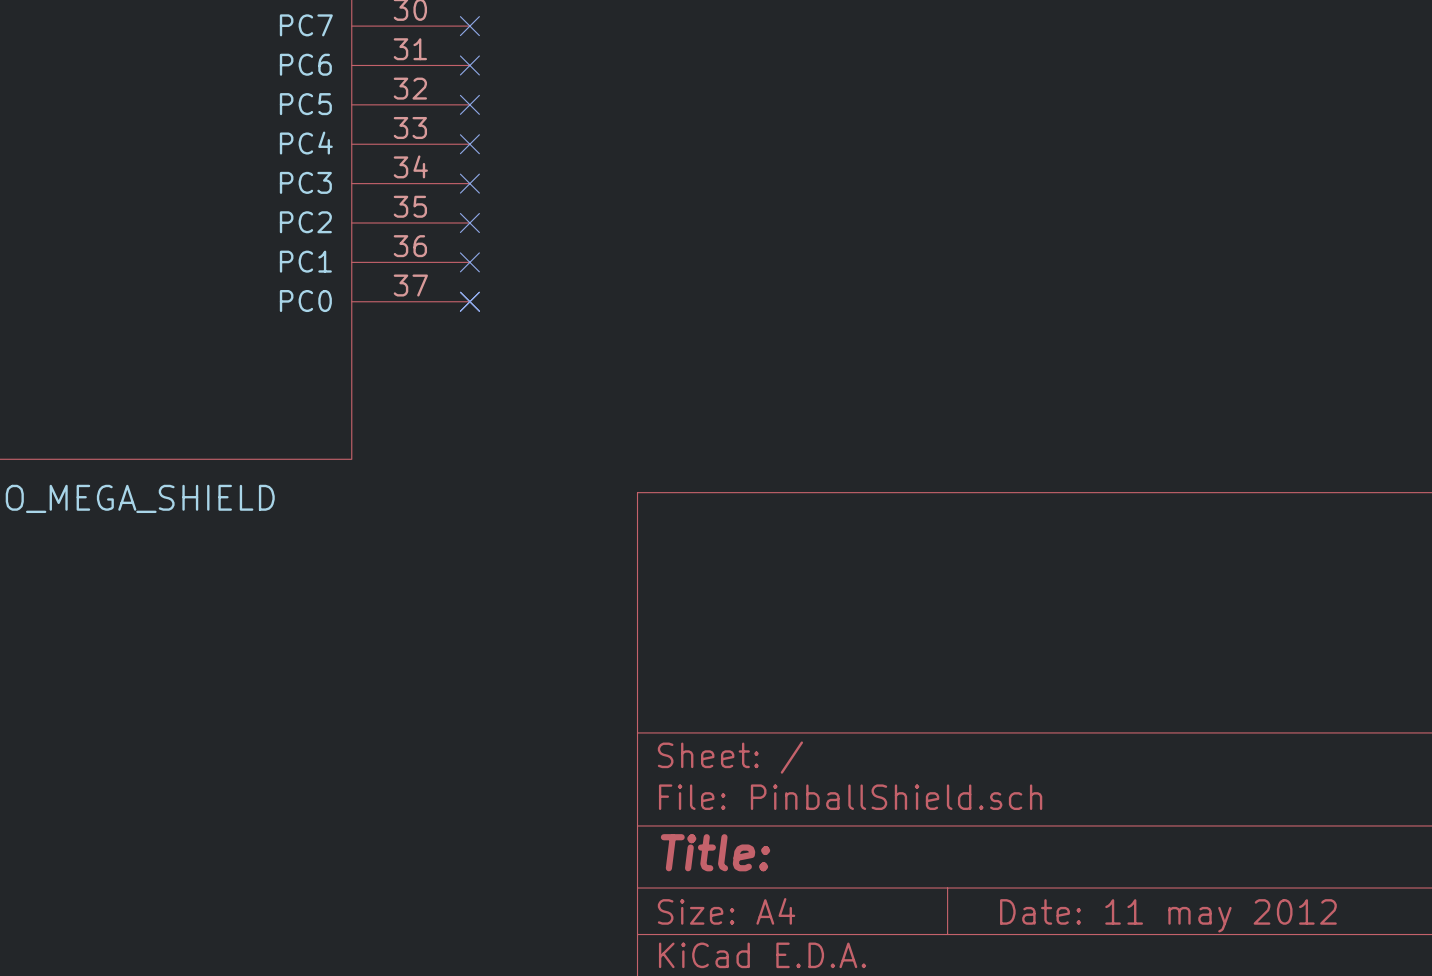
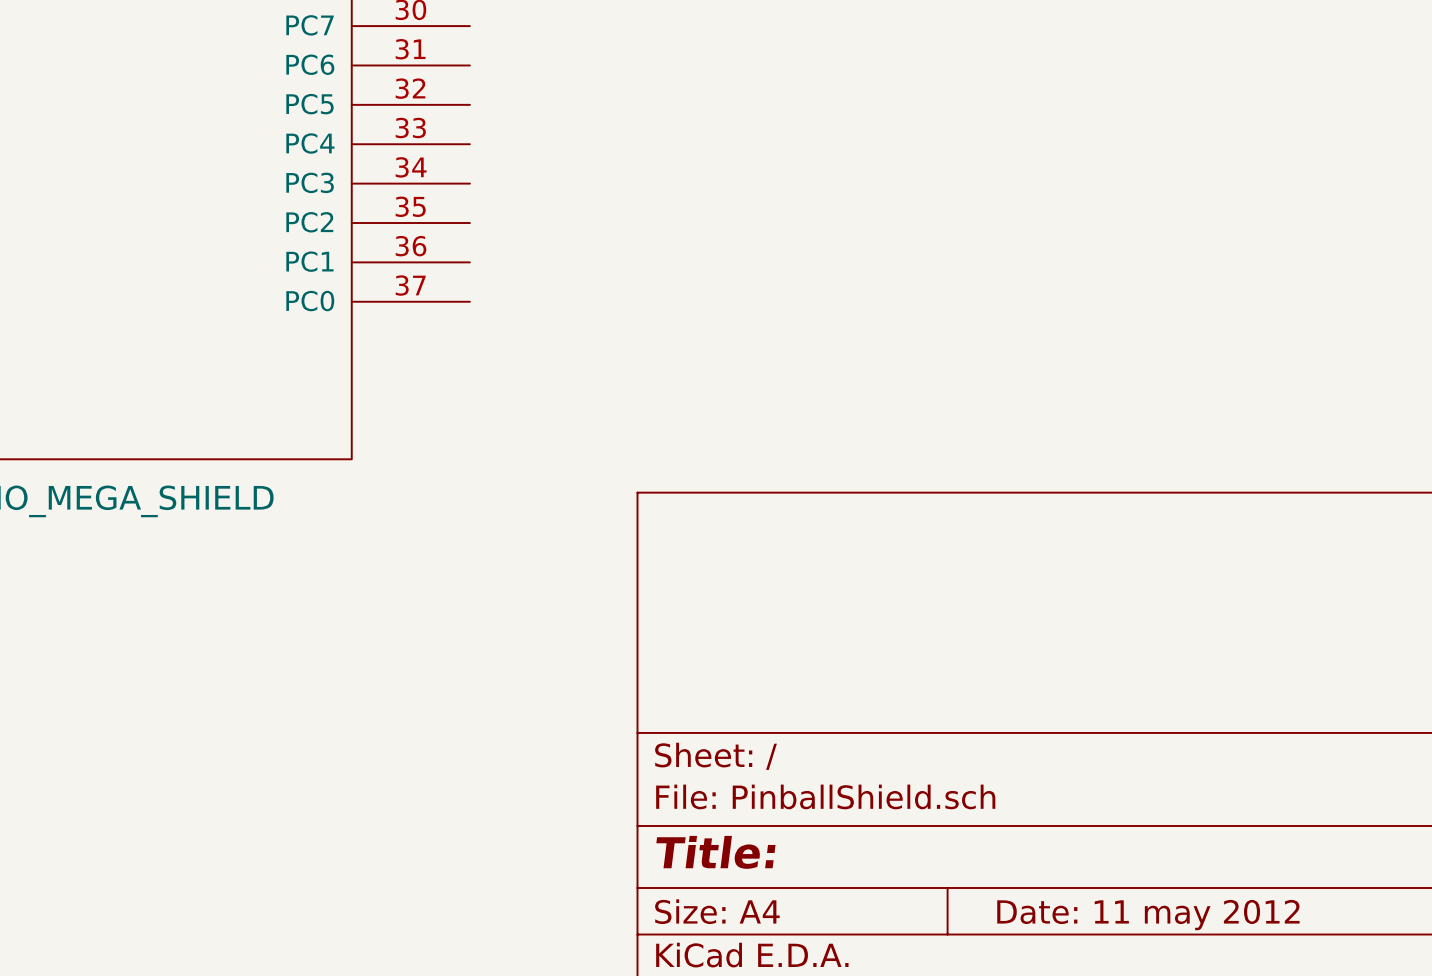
no-connect mark: (469, 26) -> none
no-connect mark: (469, 65) -> none
no-connect mark: (469, 104) -> none
no-connect mark: (469, 144) -> none
no-connect mark: (469, 183) -> none
no-connect mark: (469, 222) -> none
no-connect mark: (469, 262) -> none
no-connect mark: (469, 301) -> none

